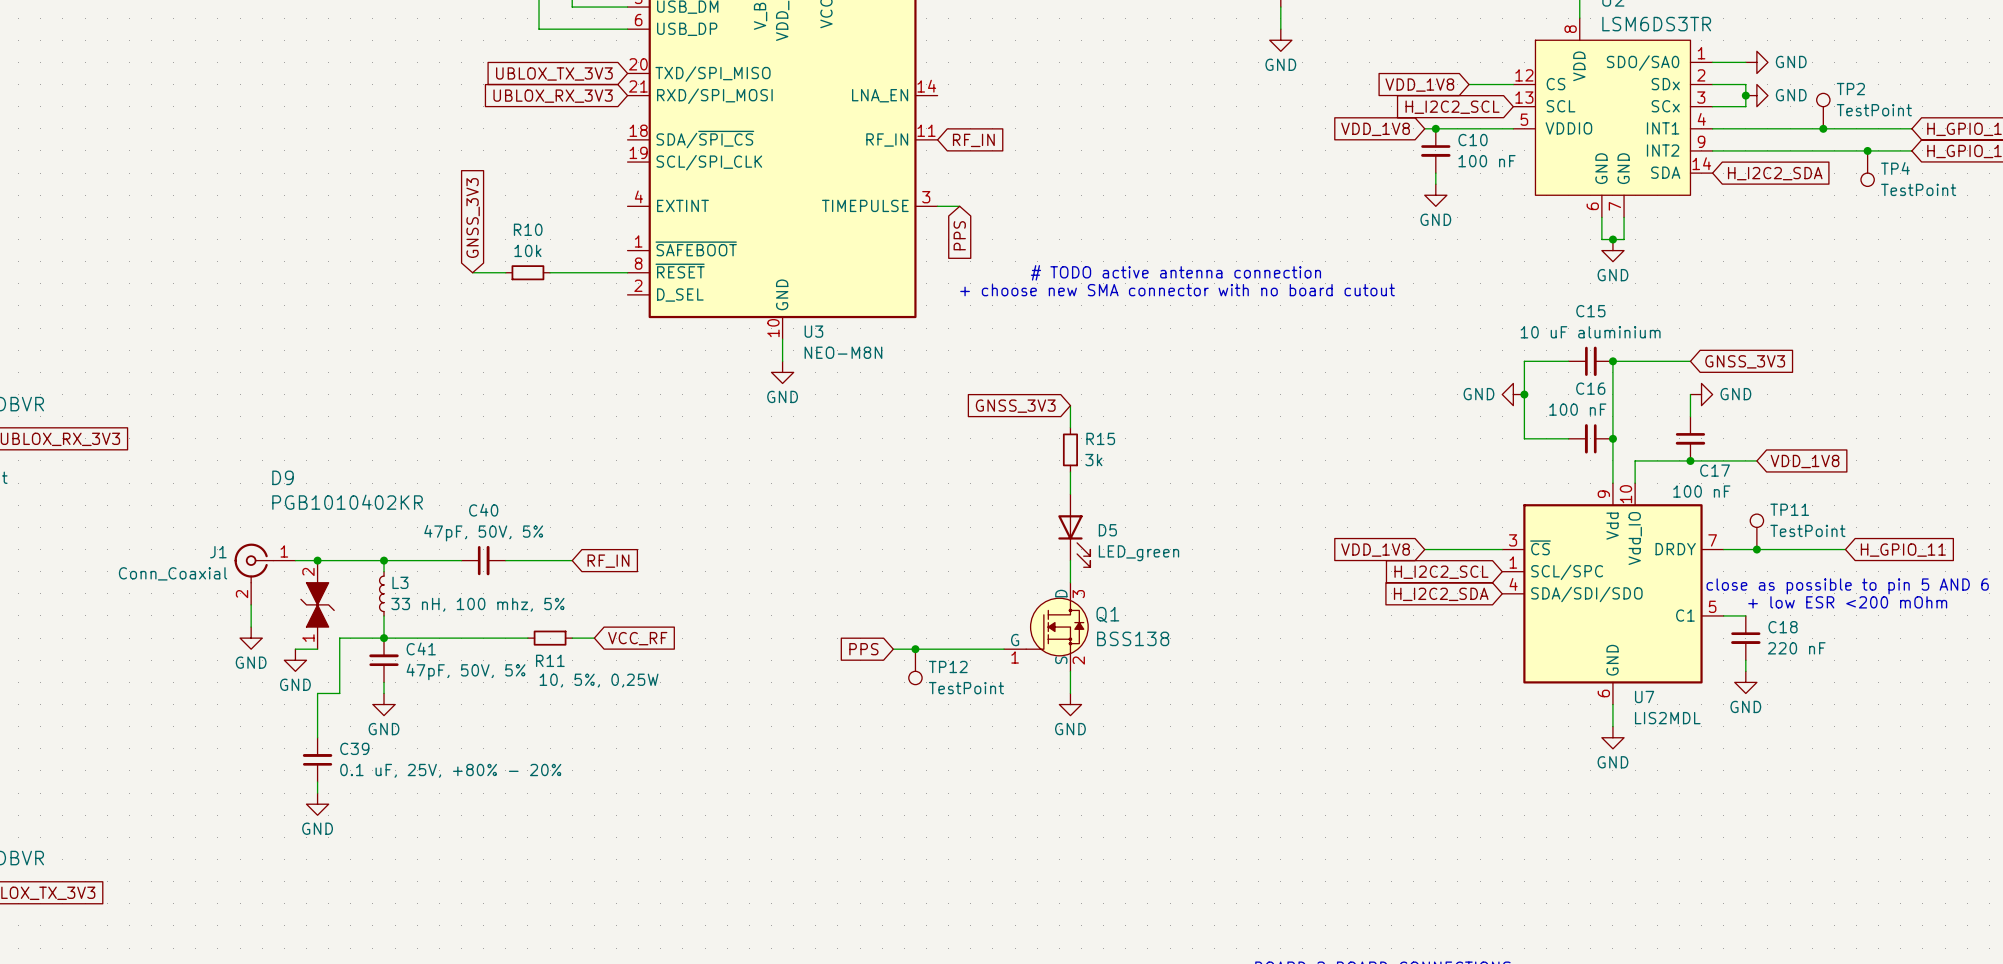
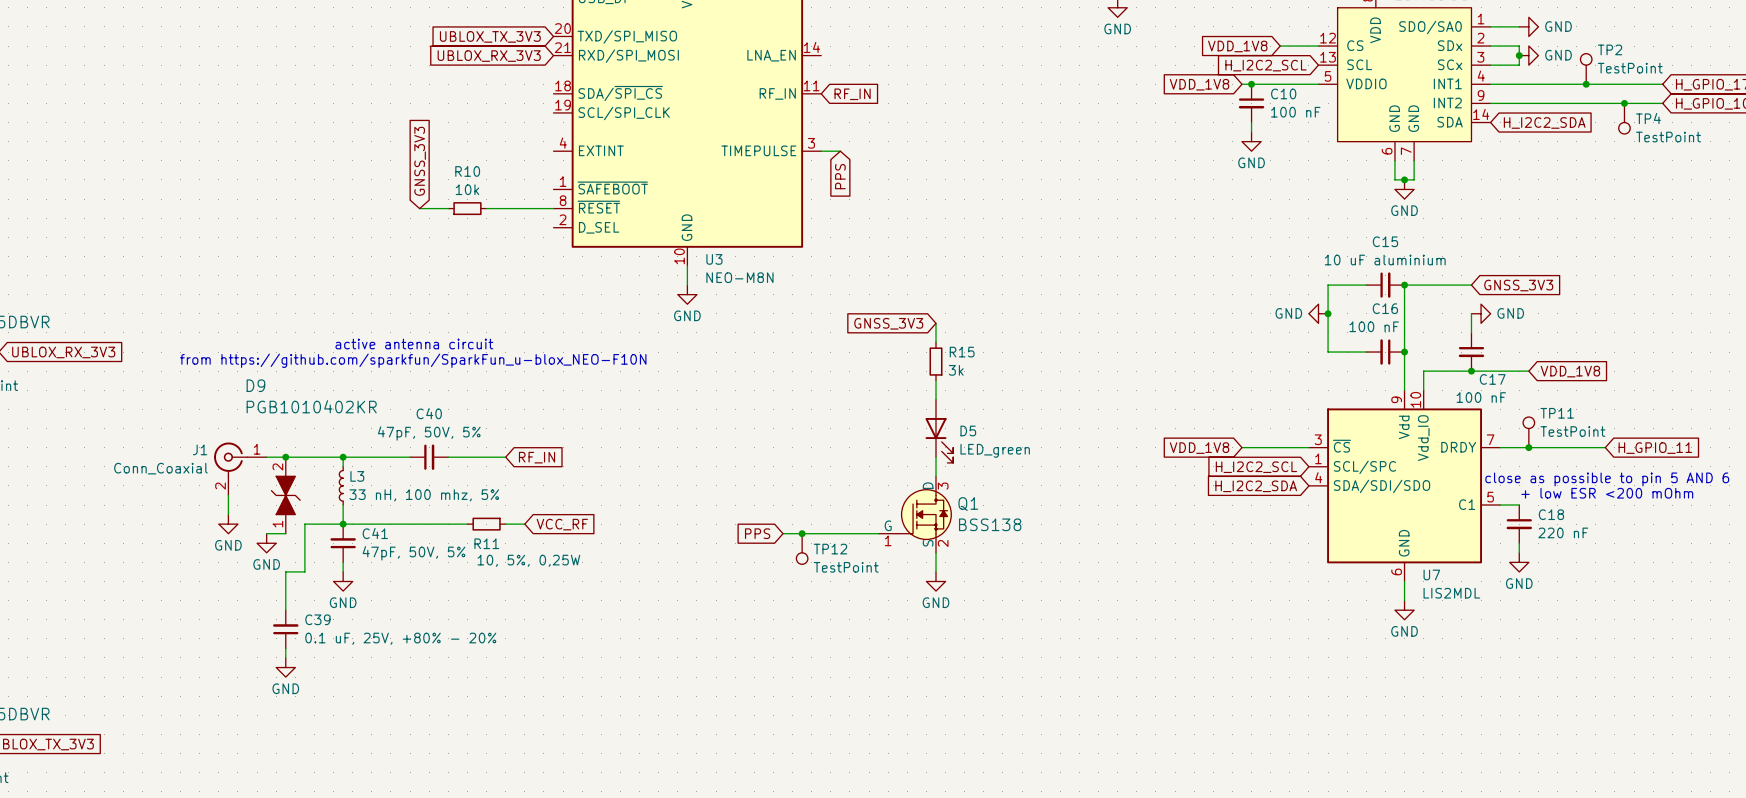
text: # TODO active antenna connection (1175, 272) -> none
text: + choose new SMA connector with no board cutout (1177, 290) -> none
text: none -> active antenna circuit (414, 343)
text: none -> from https://github.com/sparkfun/SparkFun_u-blox_NEO-F10N (413, 360)

